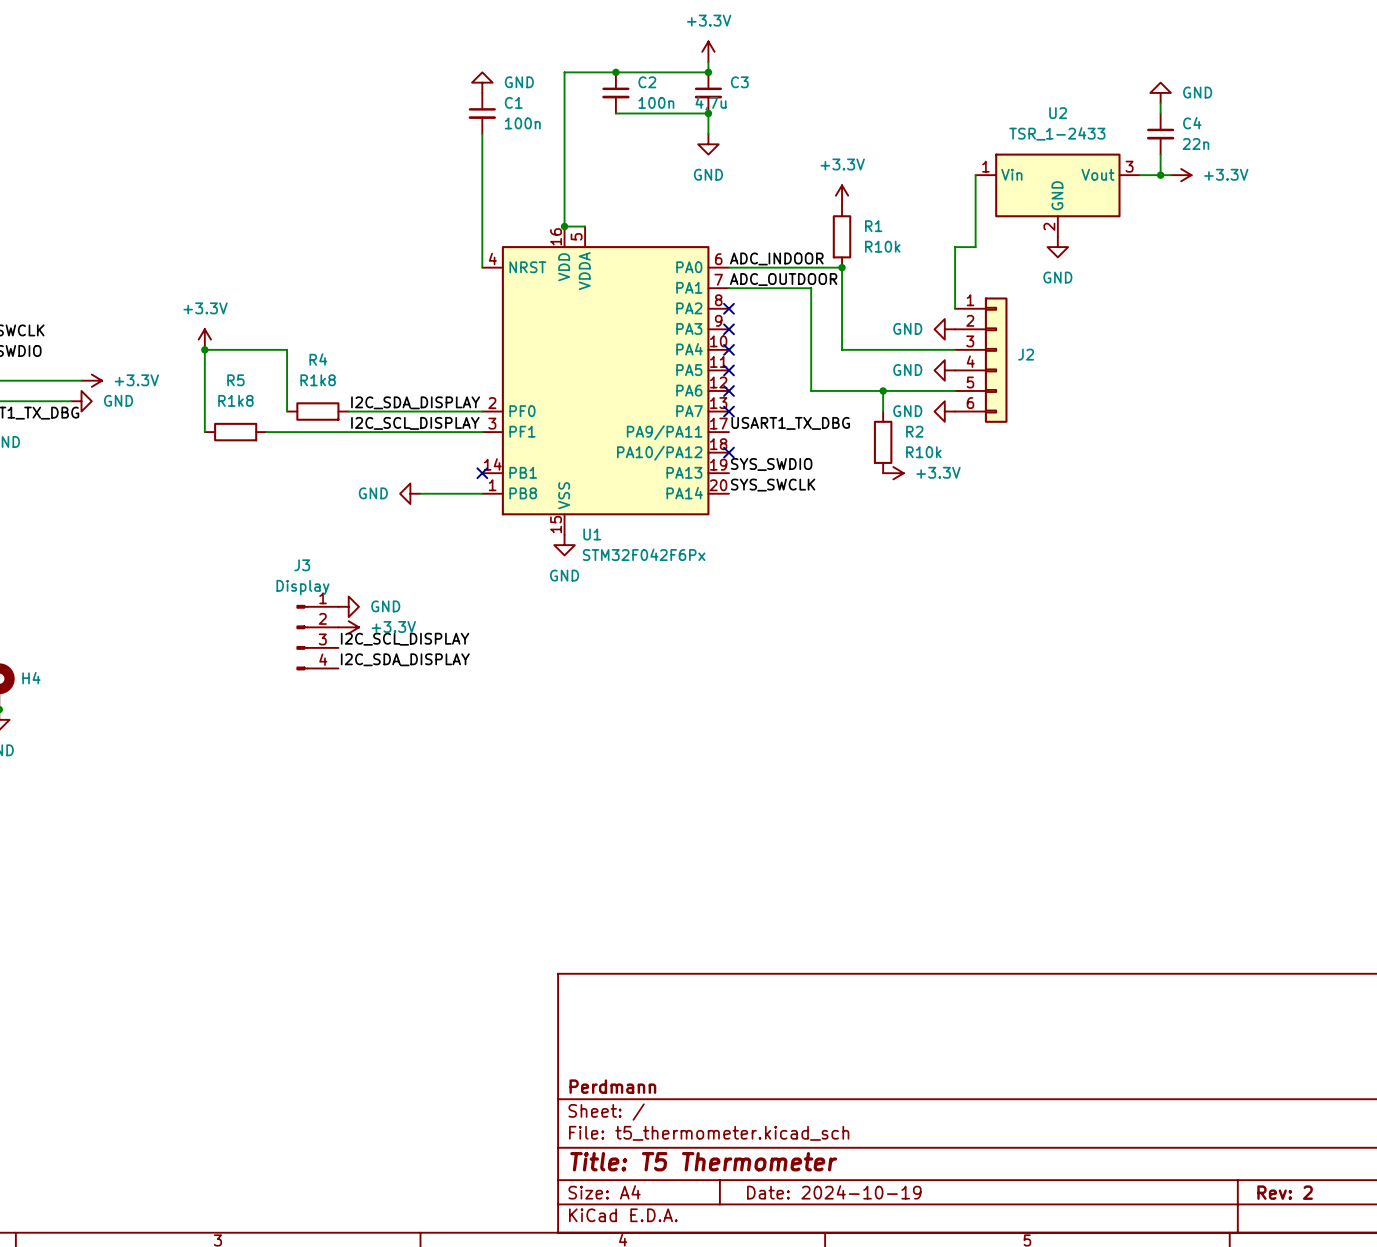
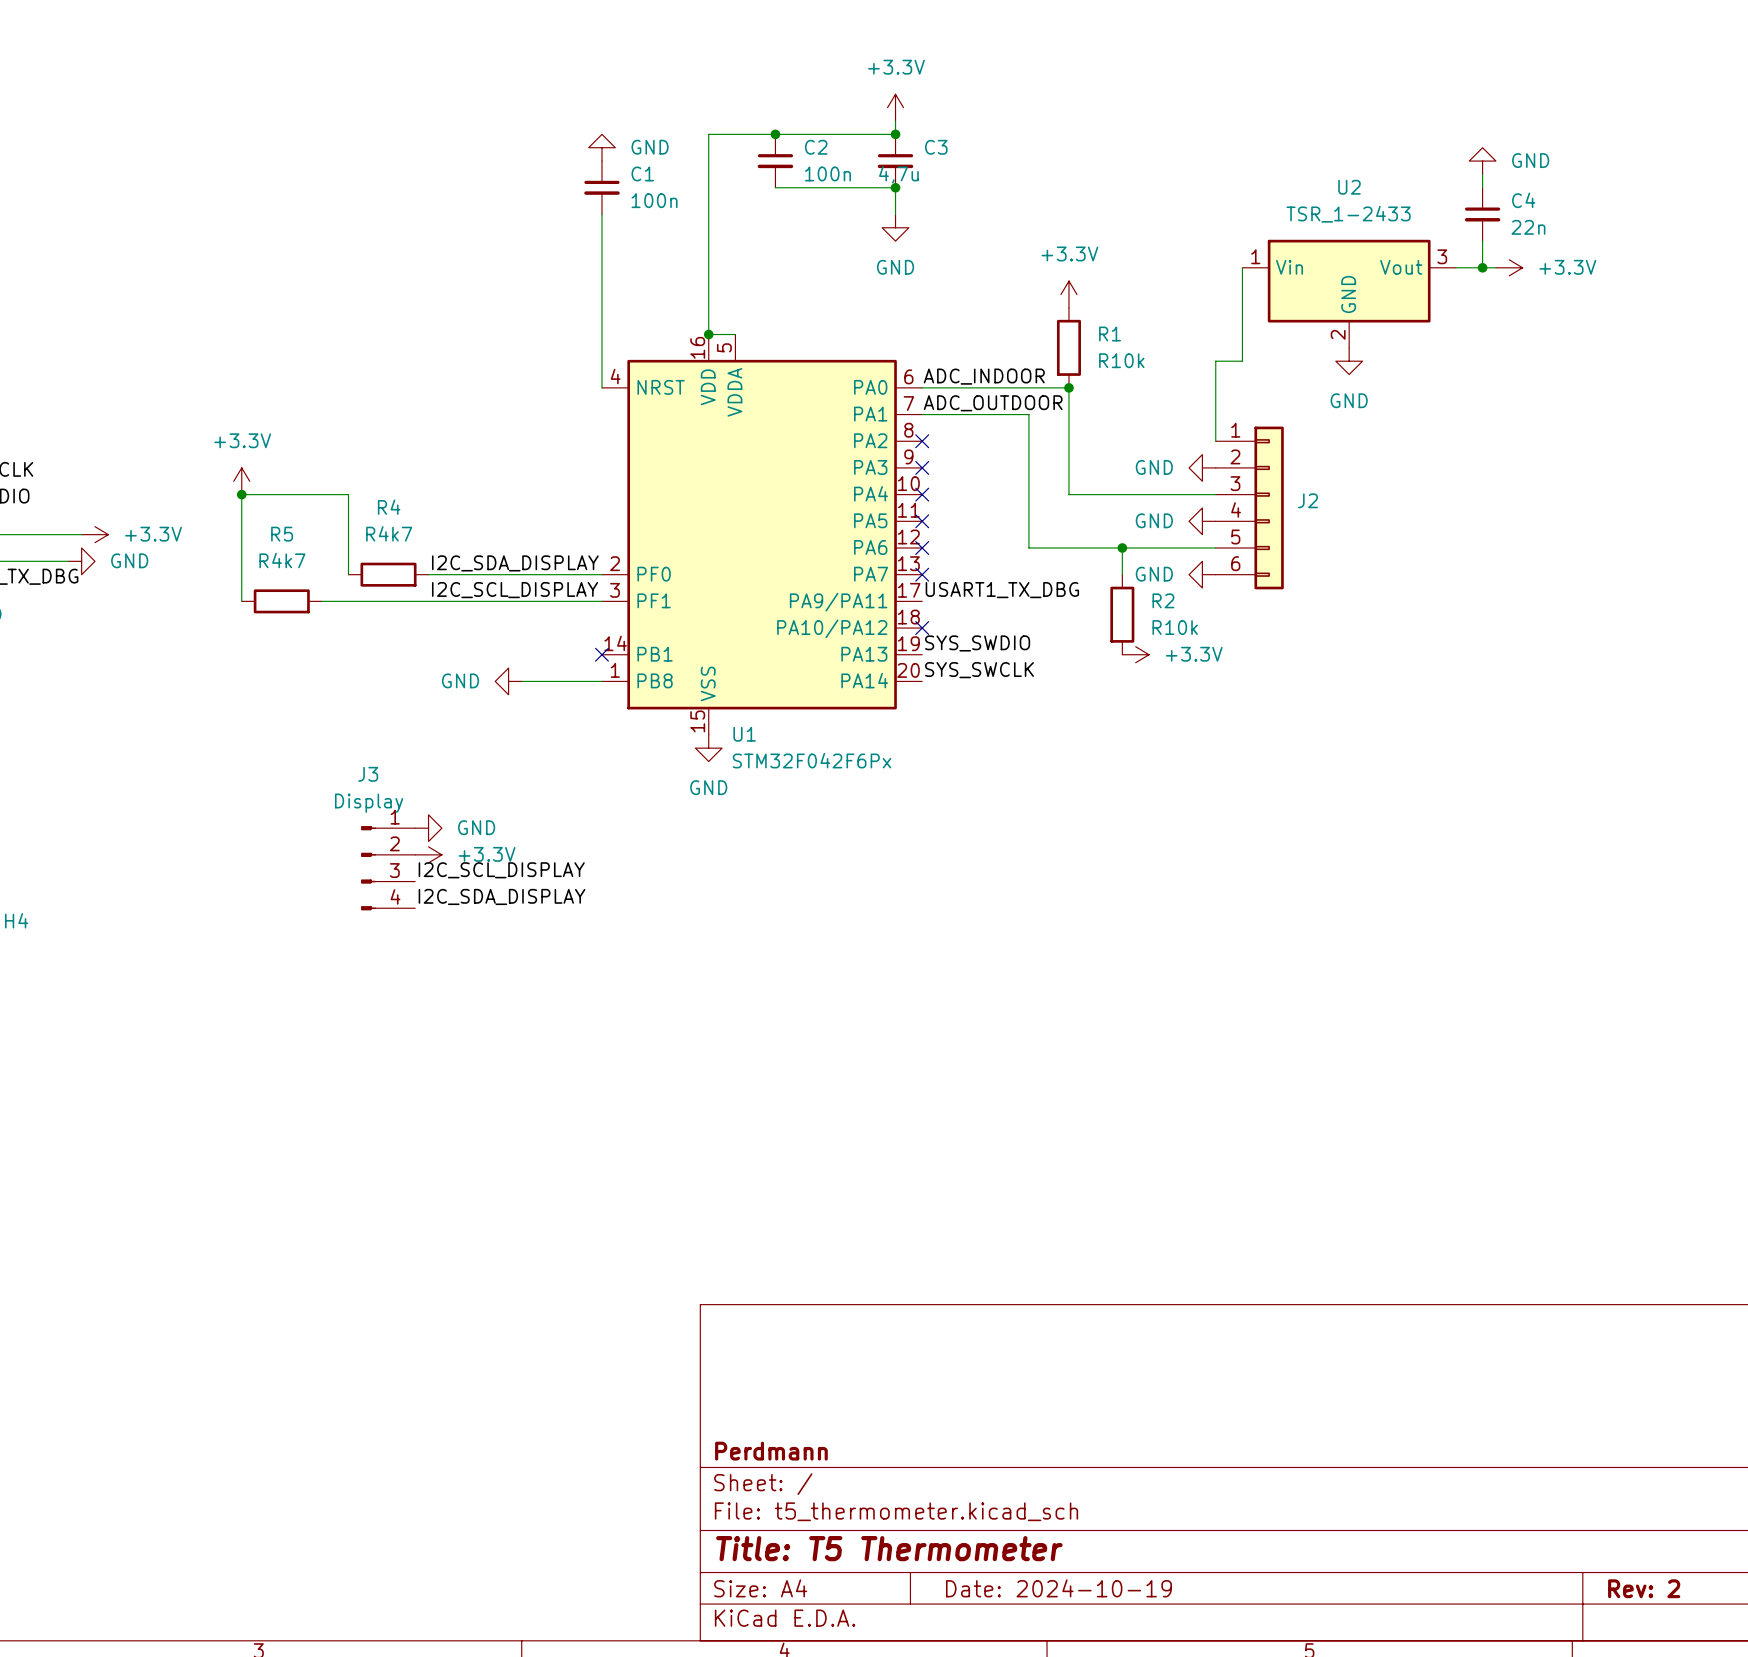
R4 value: R1k8 (318, 380) -> R4k7 (389, 533)
R5 value: R1k8 (235, 400) -> R4k7 (282, 560)

